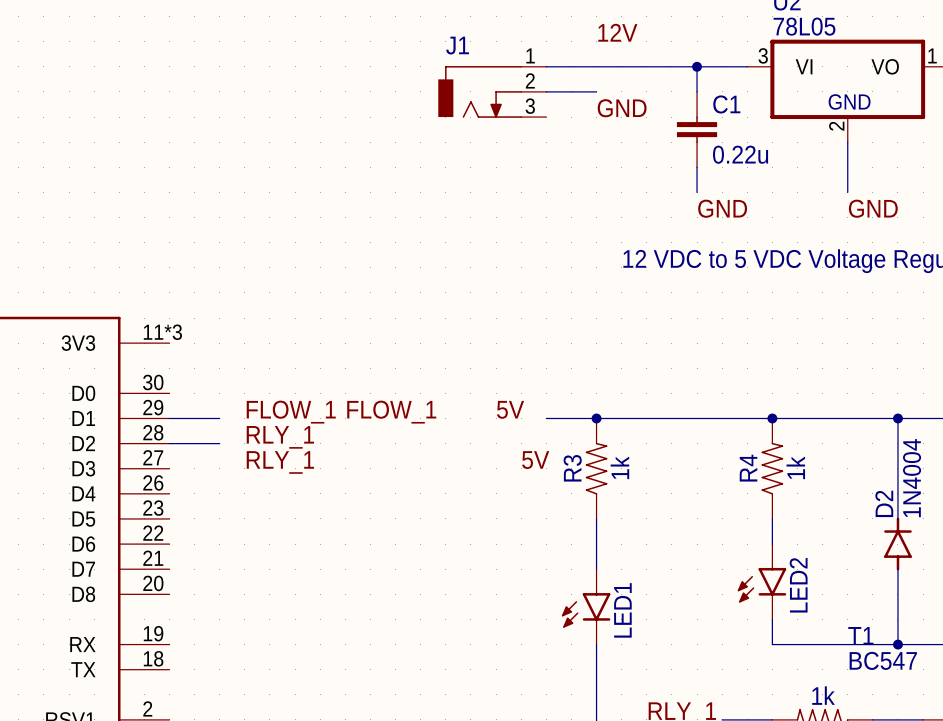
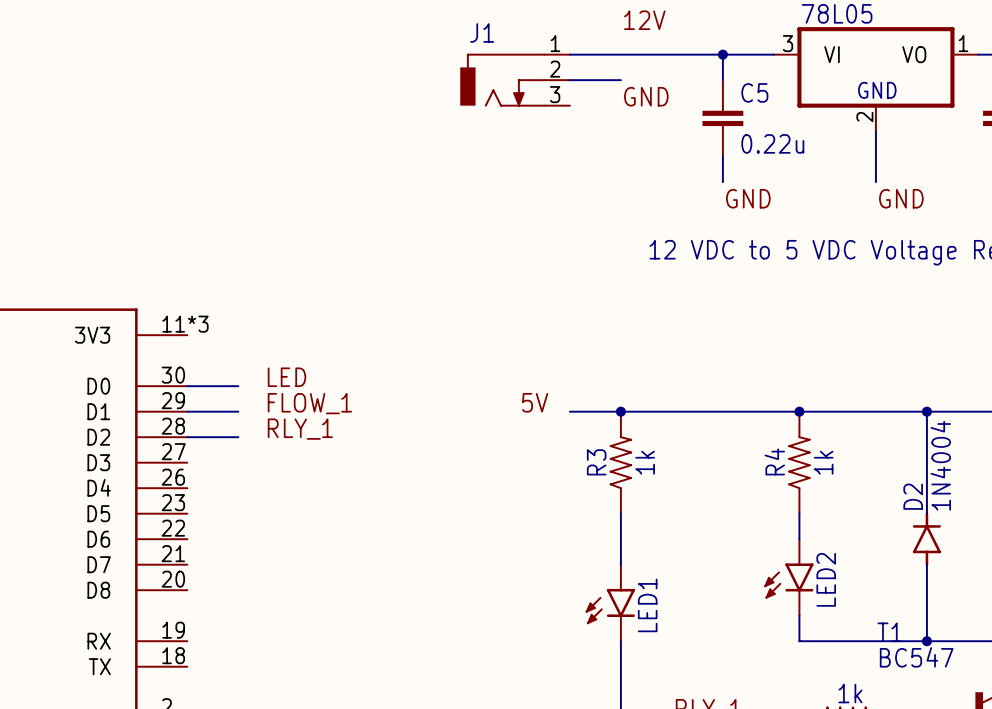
C1 name: C1 (726, 104) -> C5 (754, 92)
label: none -> LED (286, 377)
wire: none -> (187, 386) (238, 386)
label: FLOW_1 (391, 412) -> none
label: 5V (535, 460) -> none
label: RLY_1 (280, 462) -> none

